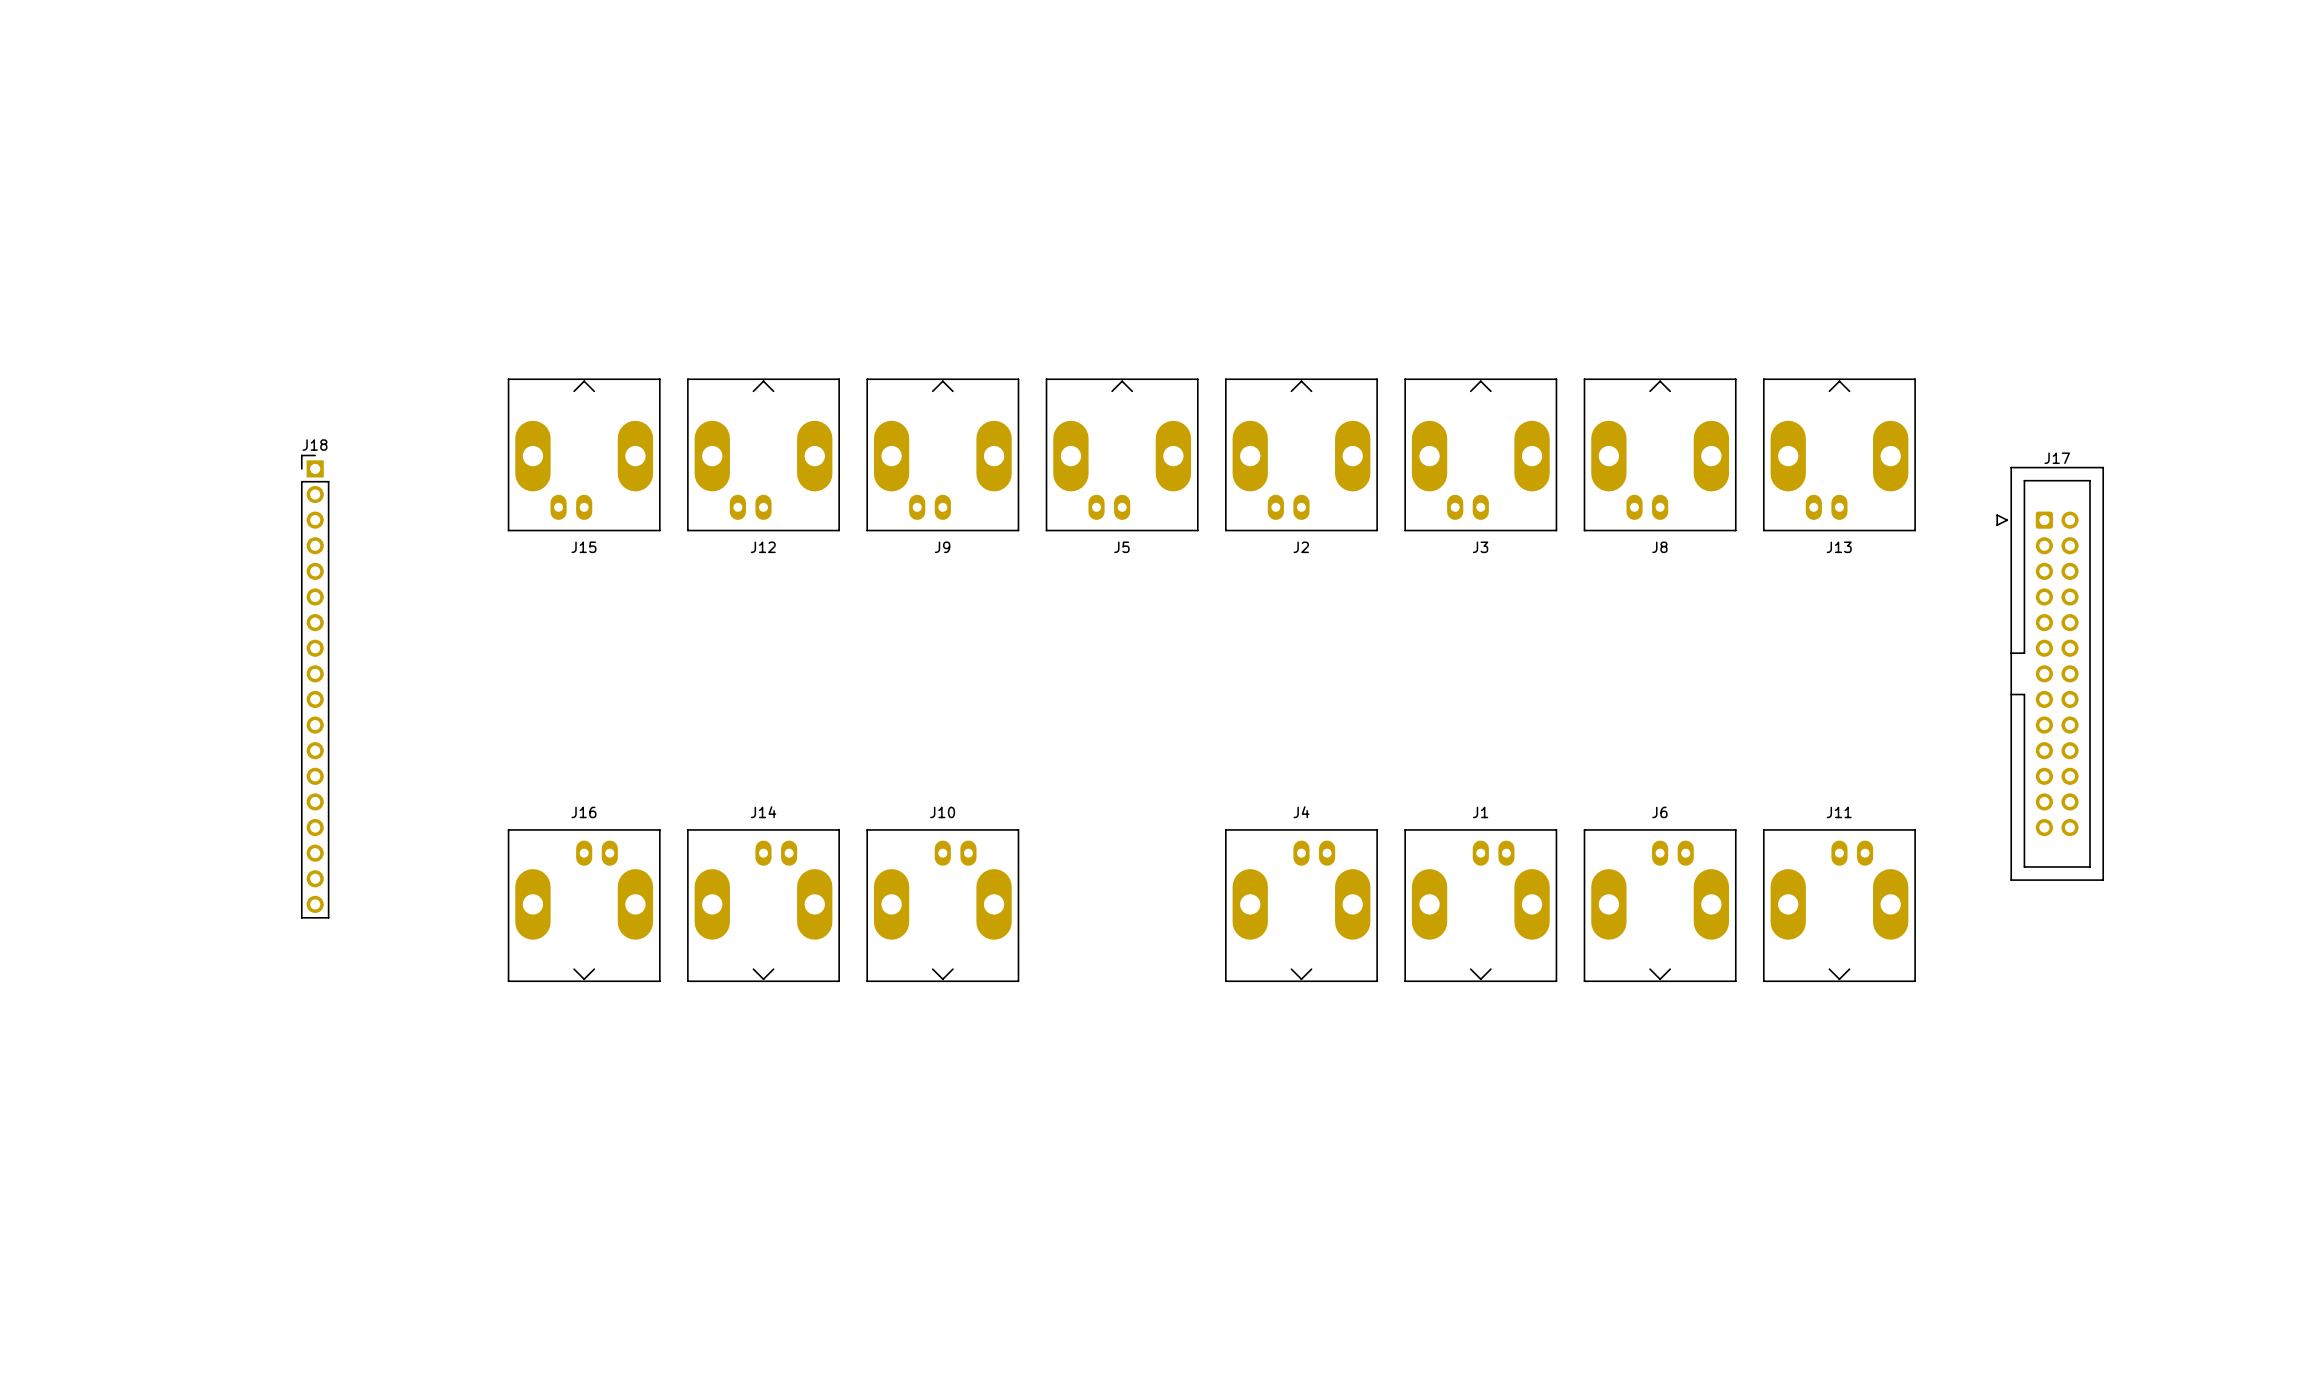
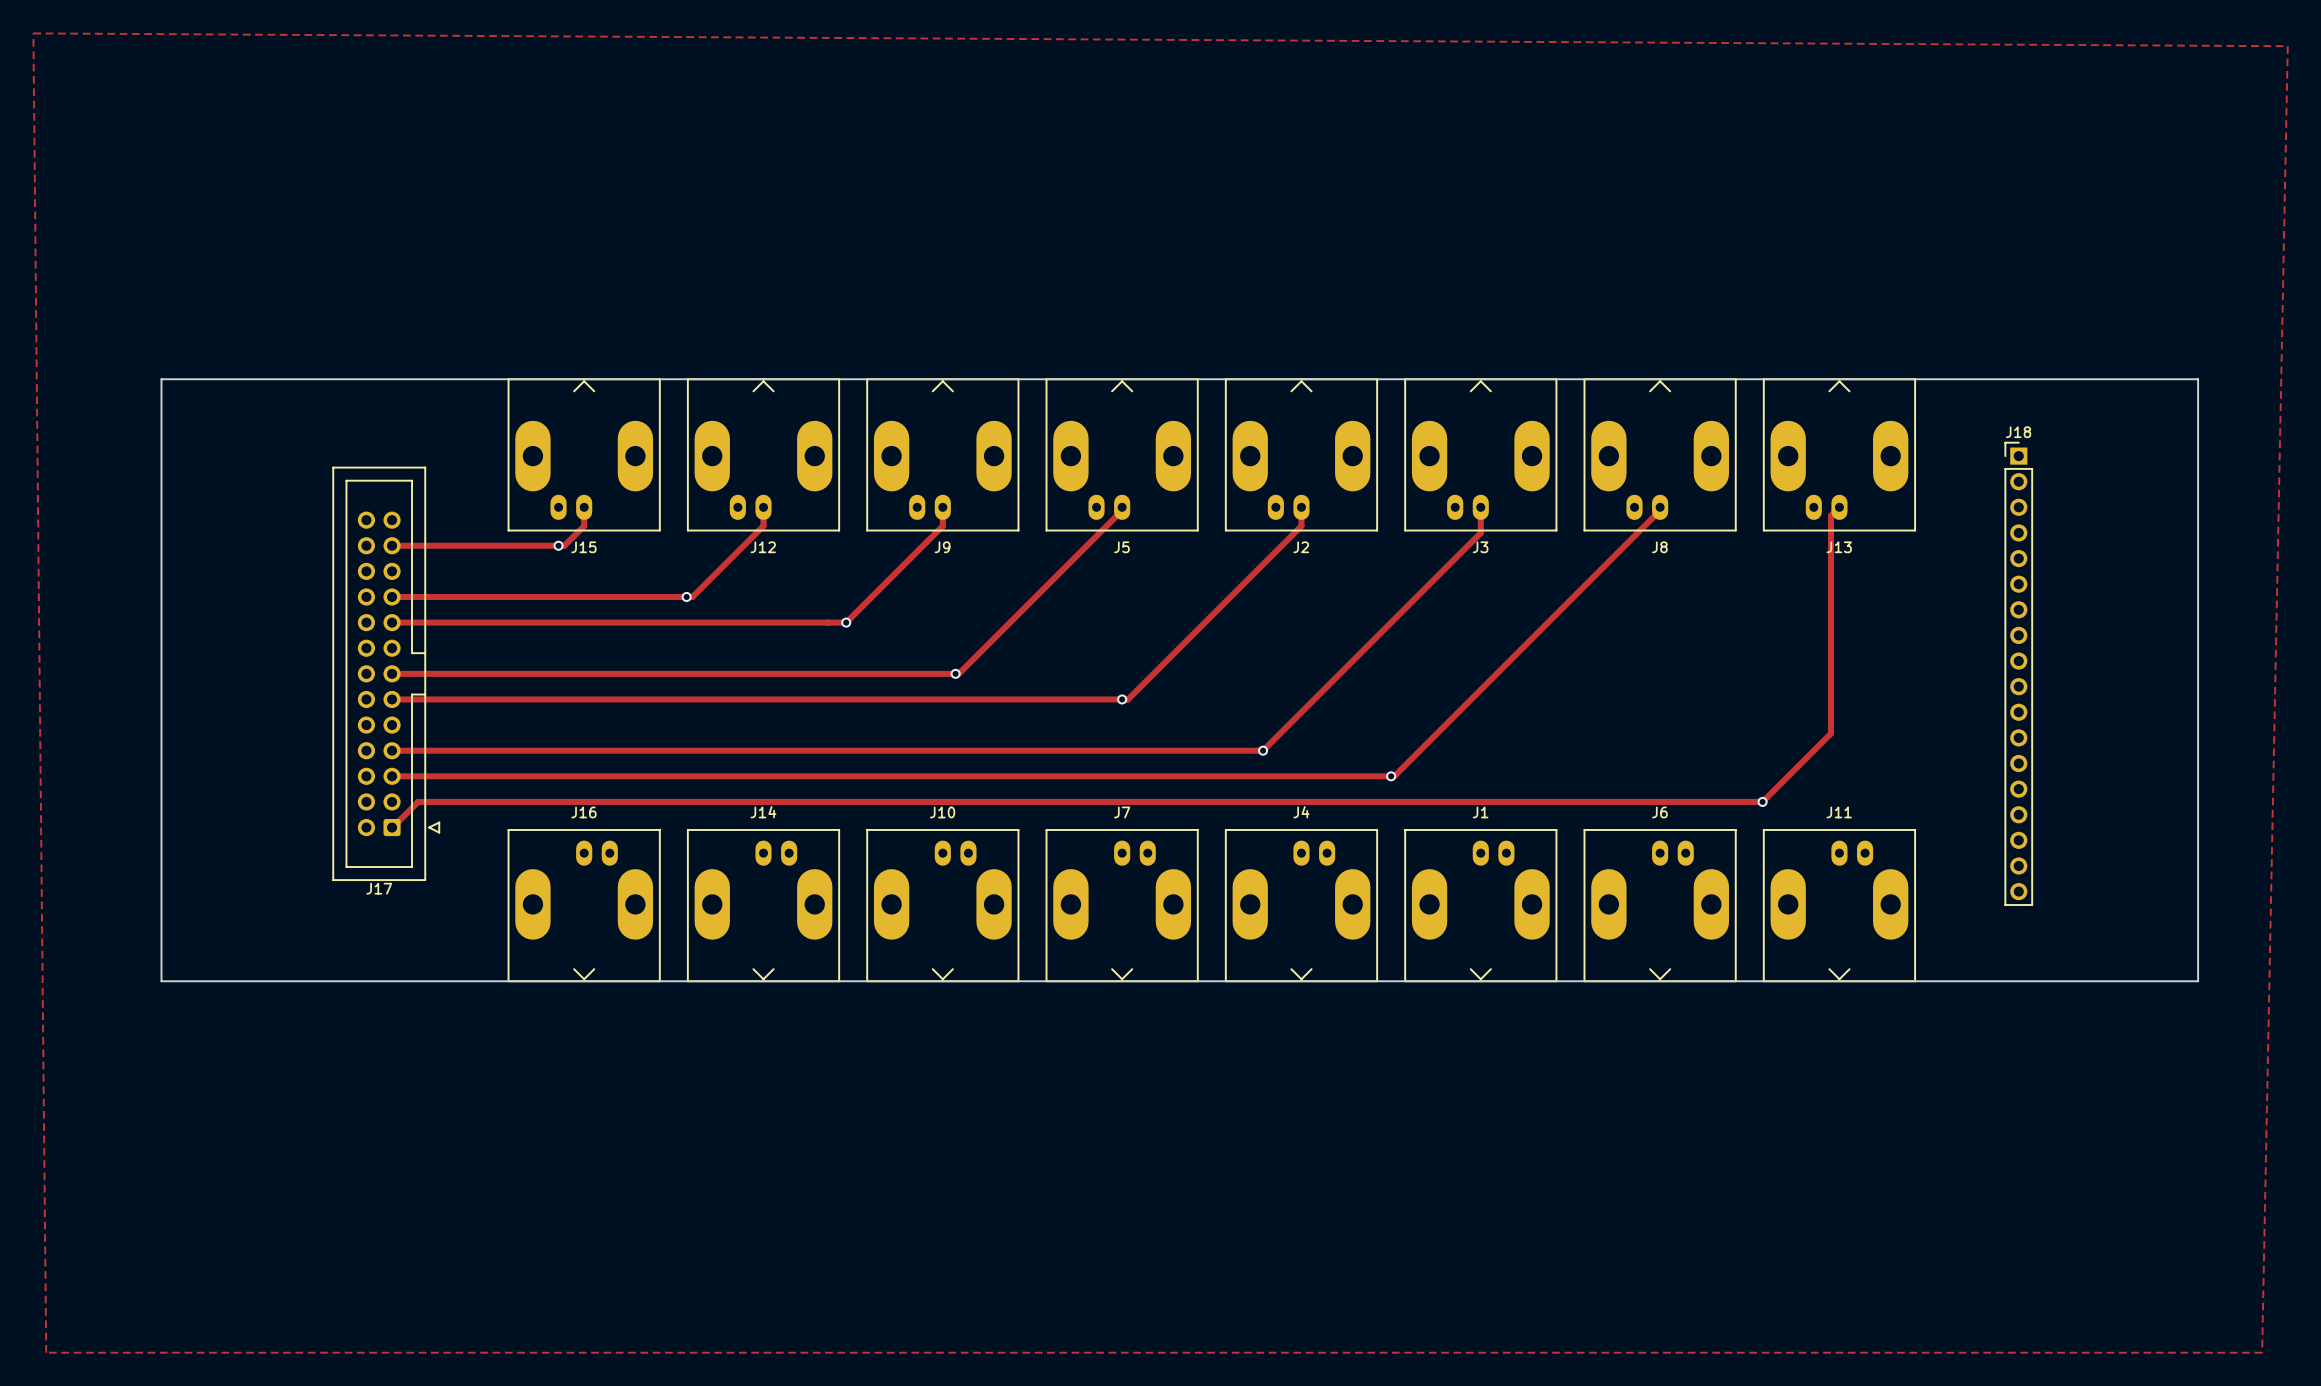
zone outline: none -> (33, 33) (46, 1352) (2262, 1352) (2287, 46) (33, 33)
board edge: none -> (161, 379) (2198, 379) (2198, 981) (161, 981) (161, 379)
track: none -> (584, 507) (584, 525) (564, 545) (392, 545)
track: none -> (763, 507) (763, 525) (692, 596) (392, 596)
track: none -> (942, 507) (942, 525) (846, 622) (392, 622)
track: none -> (1122, 507) (1122, 510) (958, 673) (392, 673)
track: none -> (1301, 507) (1301, 525) (1128, 699) (392, 699)
track: none -> (1480, 507) (1480, 532) (1263, 750) (392, 750)
track: none -> (1660, 507) (1660, 510) (1394, 776) (392, 776)
track: none -> (1839, 507) (1830, 515) (1830, 733) (1762, 801) (418, 801) (392, 827)
via: none -> (558, 545)
via: none -> (686, 596)
via: none -> (846, 622)
via: none -> (955, 673)
J17 rotation: 0° (2050, 673) -> 180° (386, 673)
J17 position: (2050, 673) -> (386, 673)
J18 position: (315, 686) -> (2018, 673)
via: none -> (1122, 699)
via: none -> (1263, 750)
via: none -> (1391, 776)
via: none -> (1762, 801)
J7: none -> (1122, 905)

